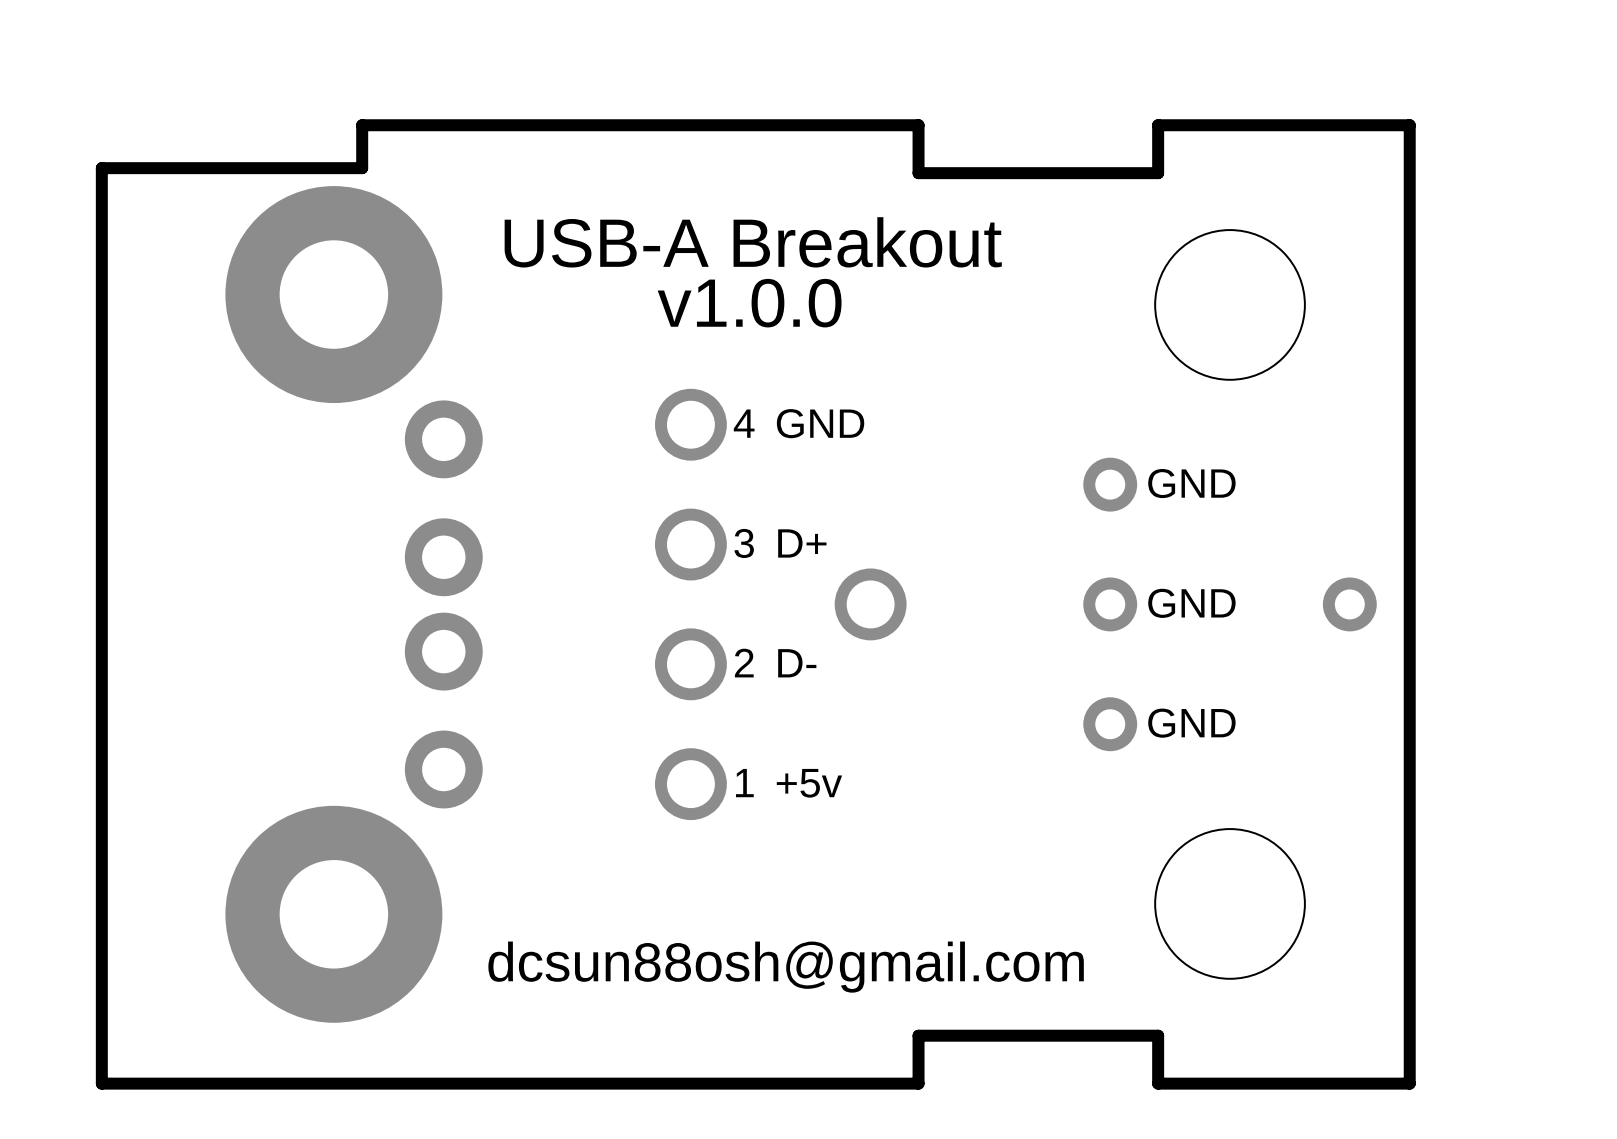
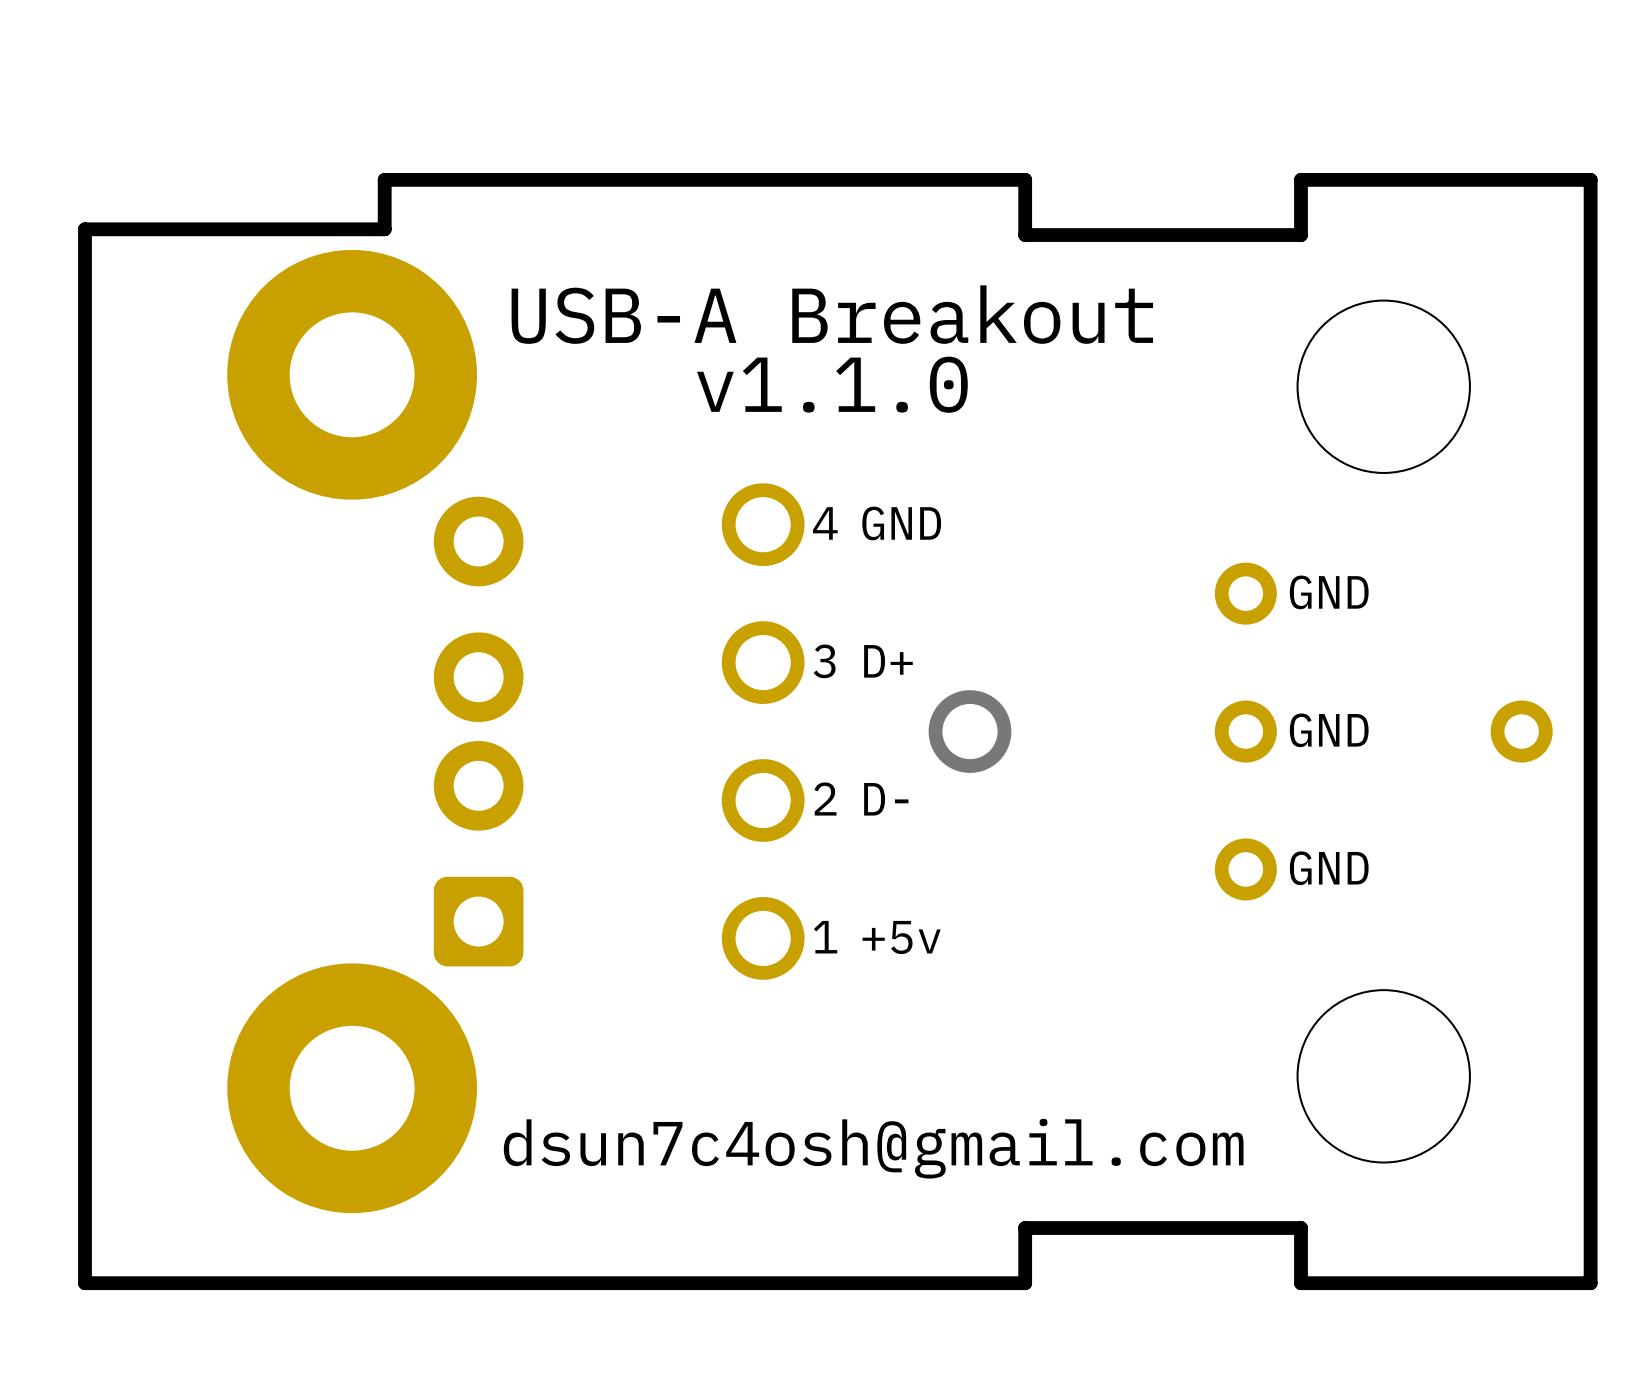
part footprint: [225, 186, 483, 1023] -> [227, 249, 524, 1214]
text: v1.0.0 (749, 303) -> v1.1.0 (832, 384)
text: dcsun88osh@gmail.com (786, 967) -> dsun7c4osh@gmail.com (873, 1148)

